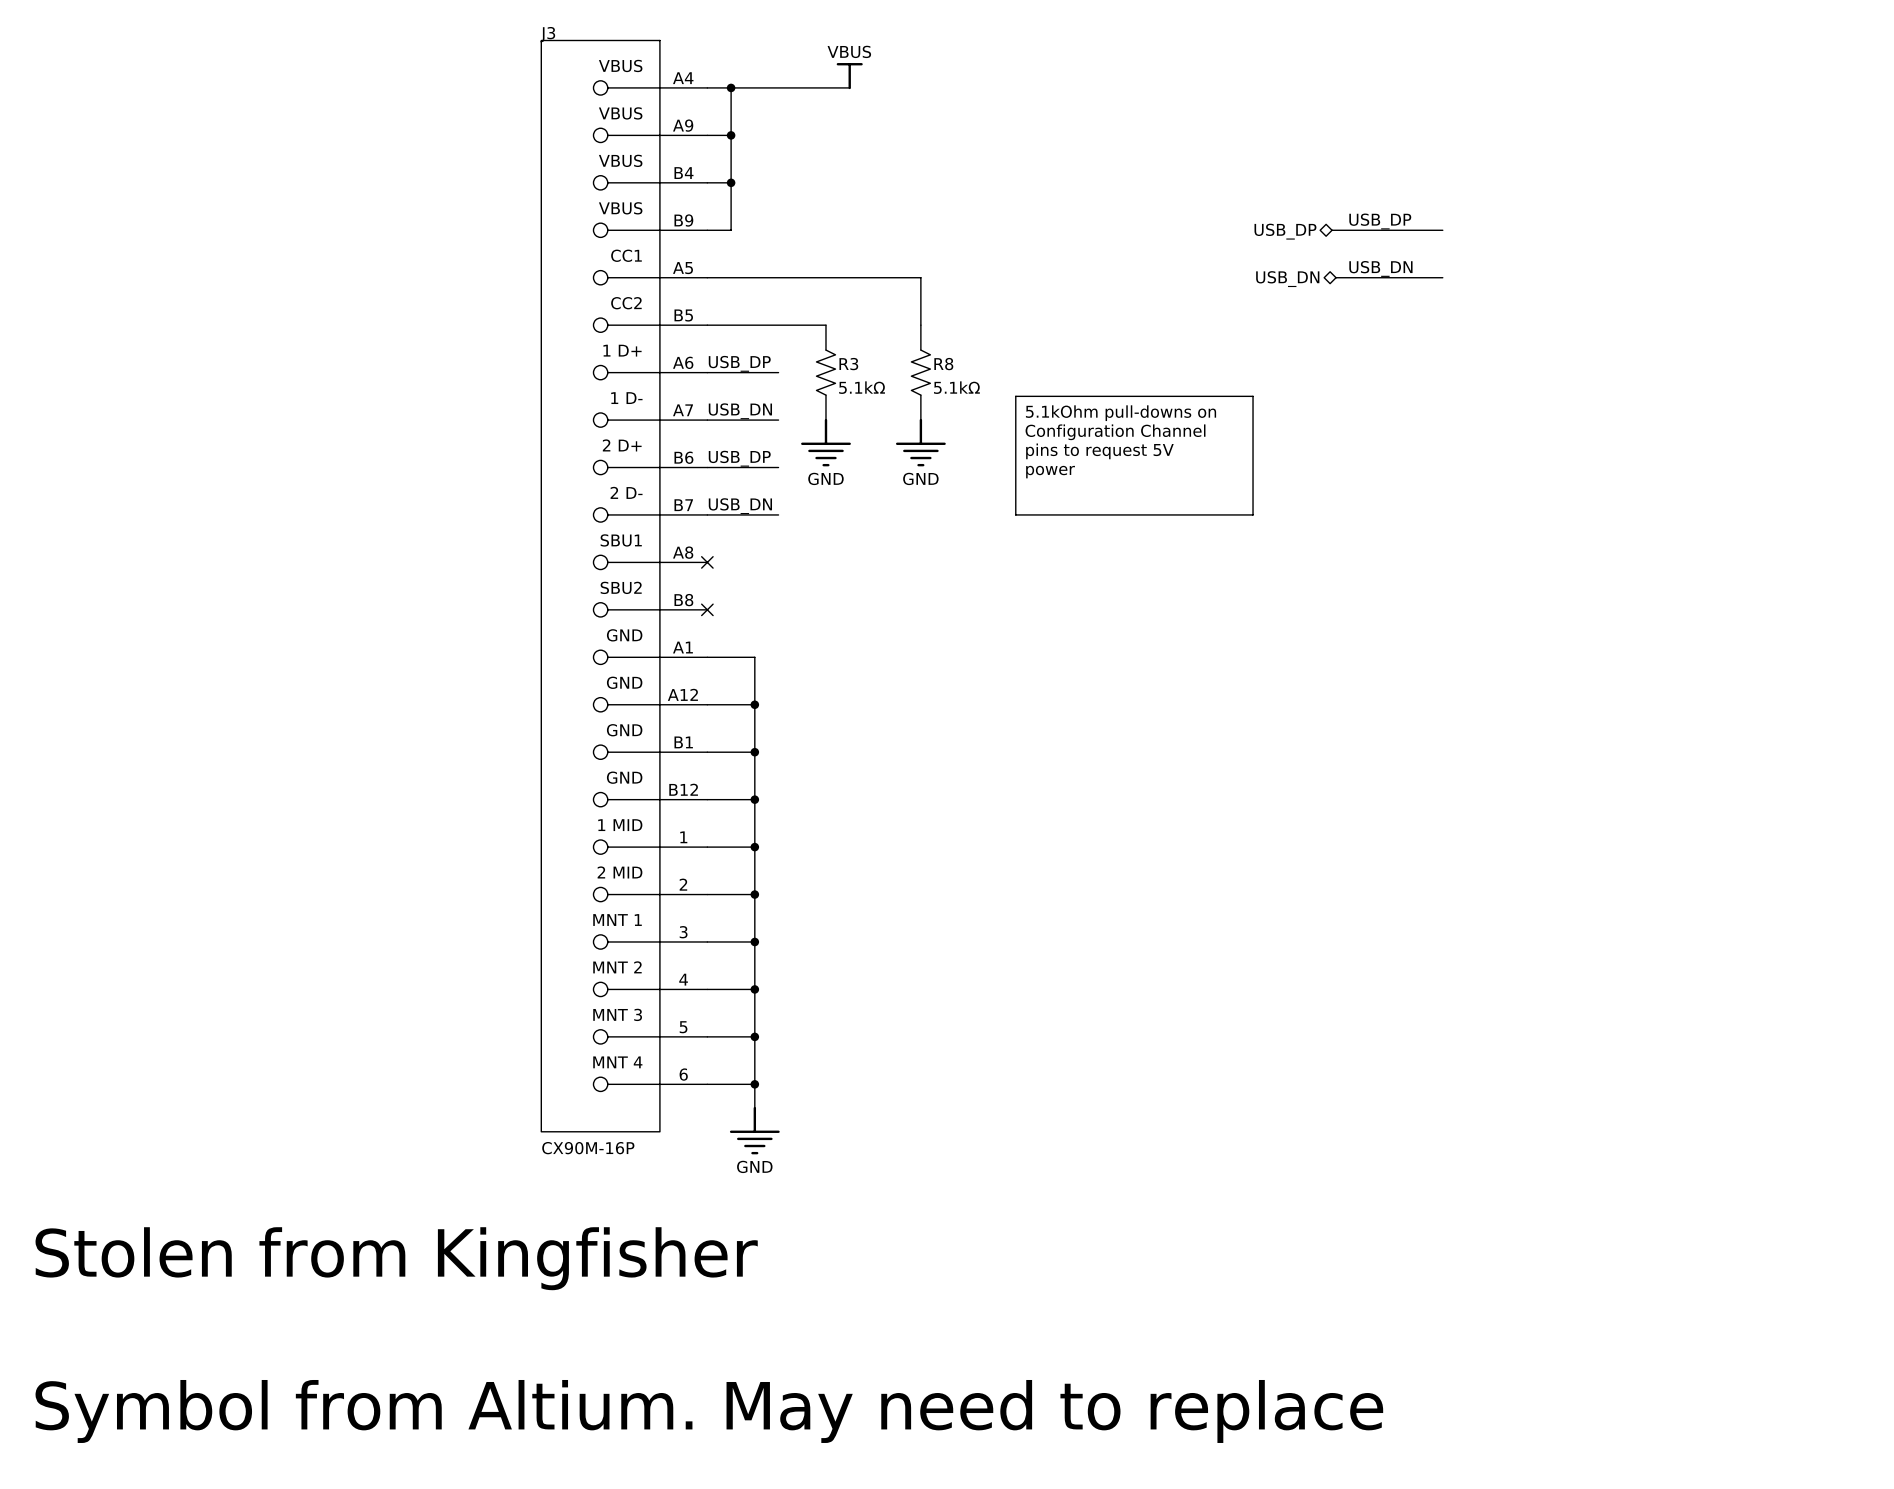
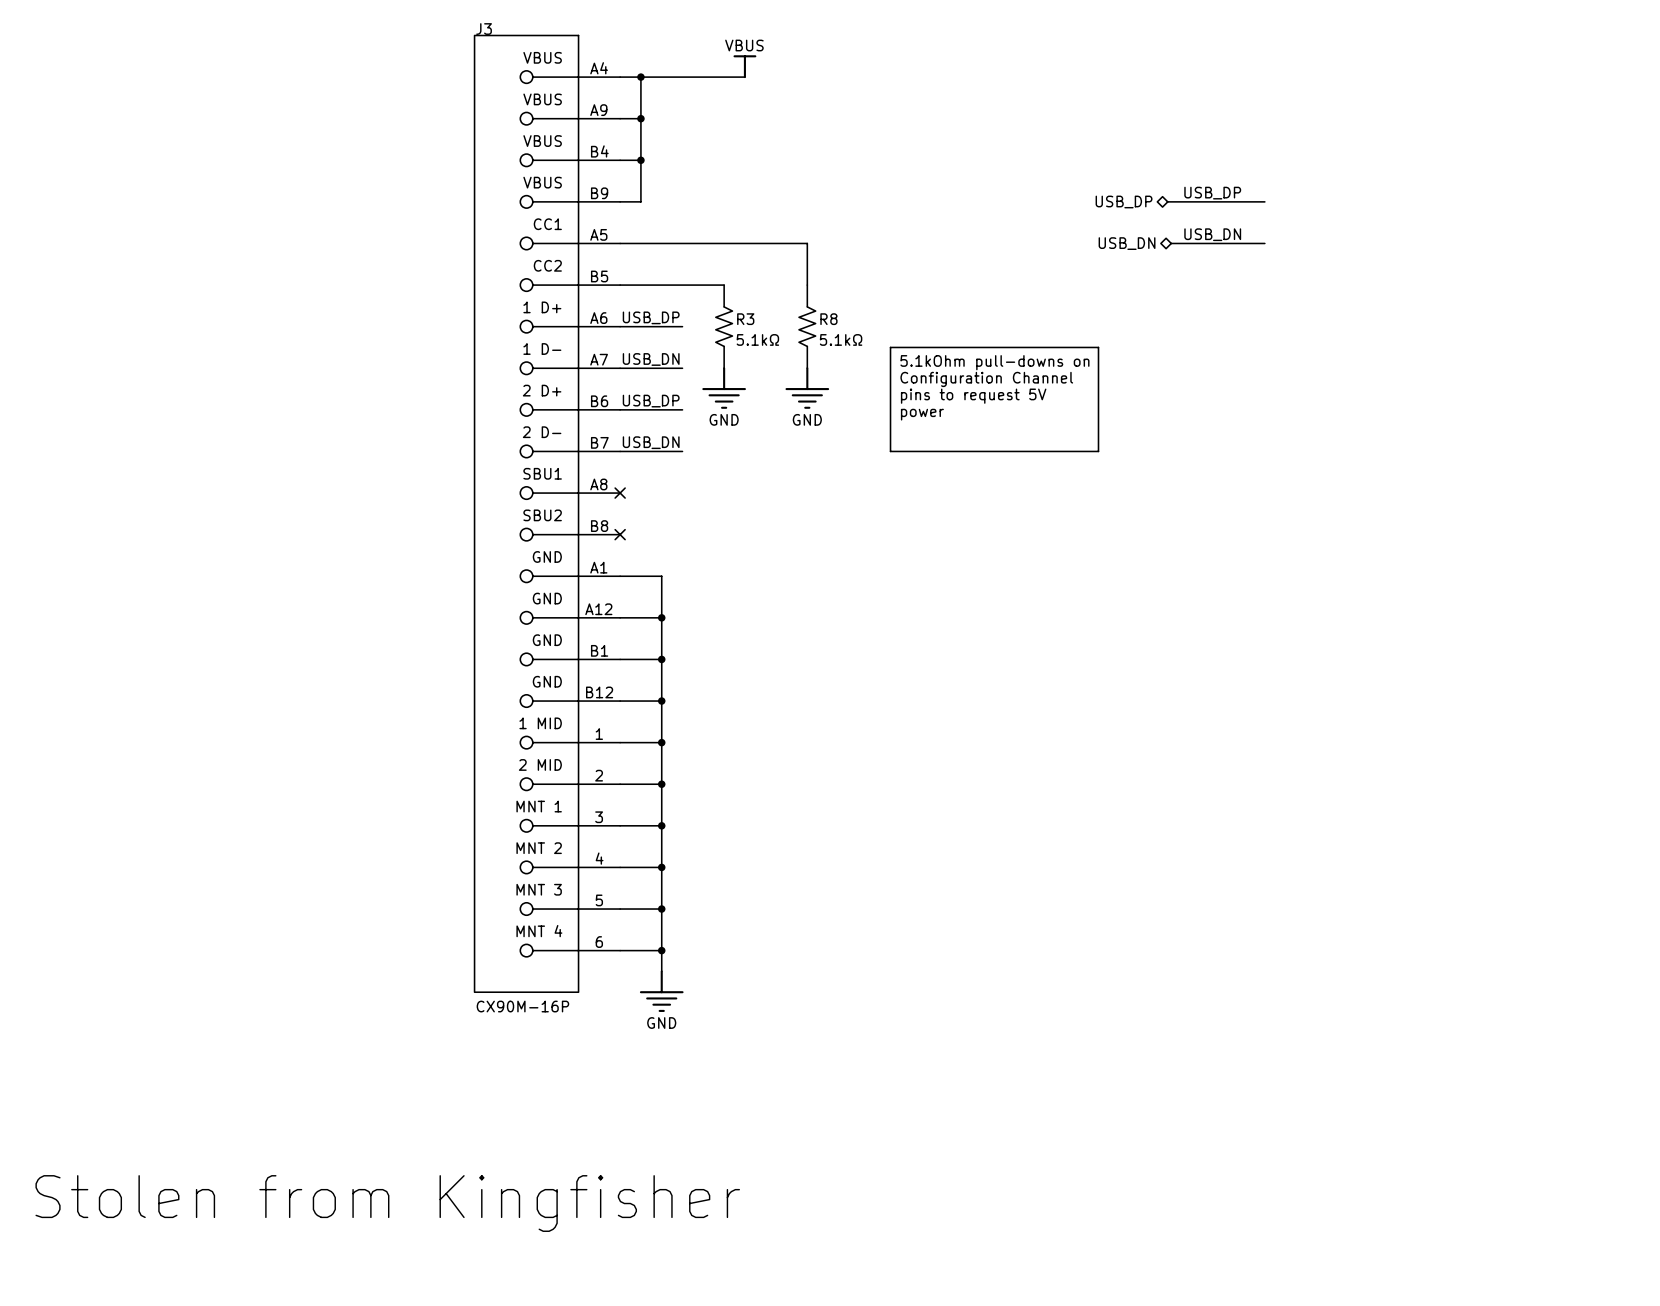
text position: Stolen from Kingfisher (396, 1258) -> Stolen from Kingfisher (387, 1203)
text: Symbol from Altium. May need to replace (709, 1411) -> none

